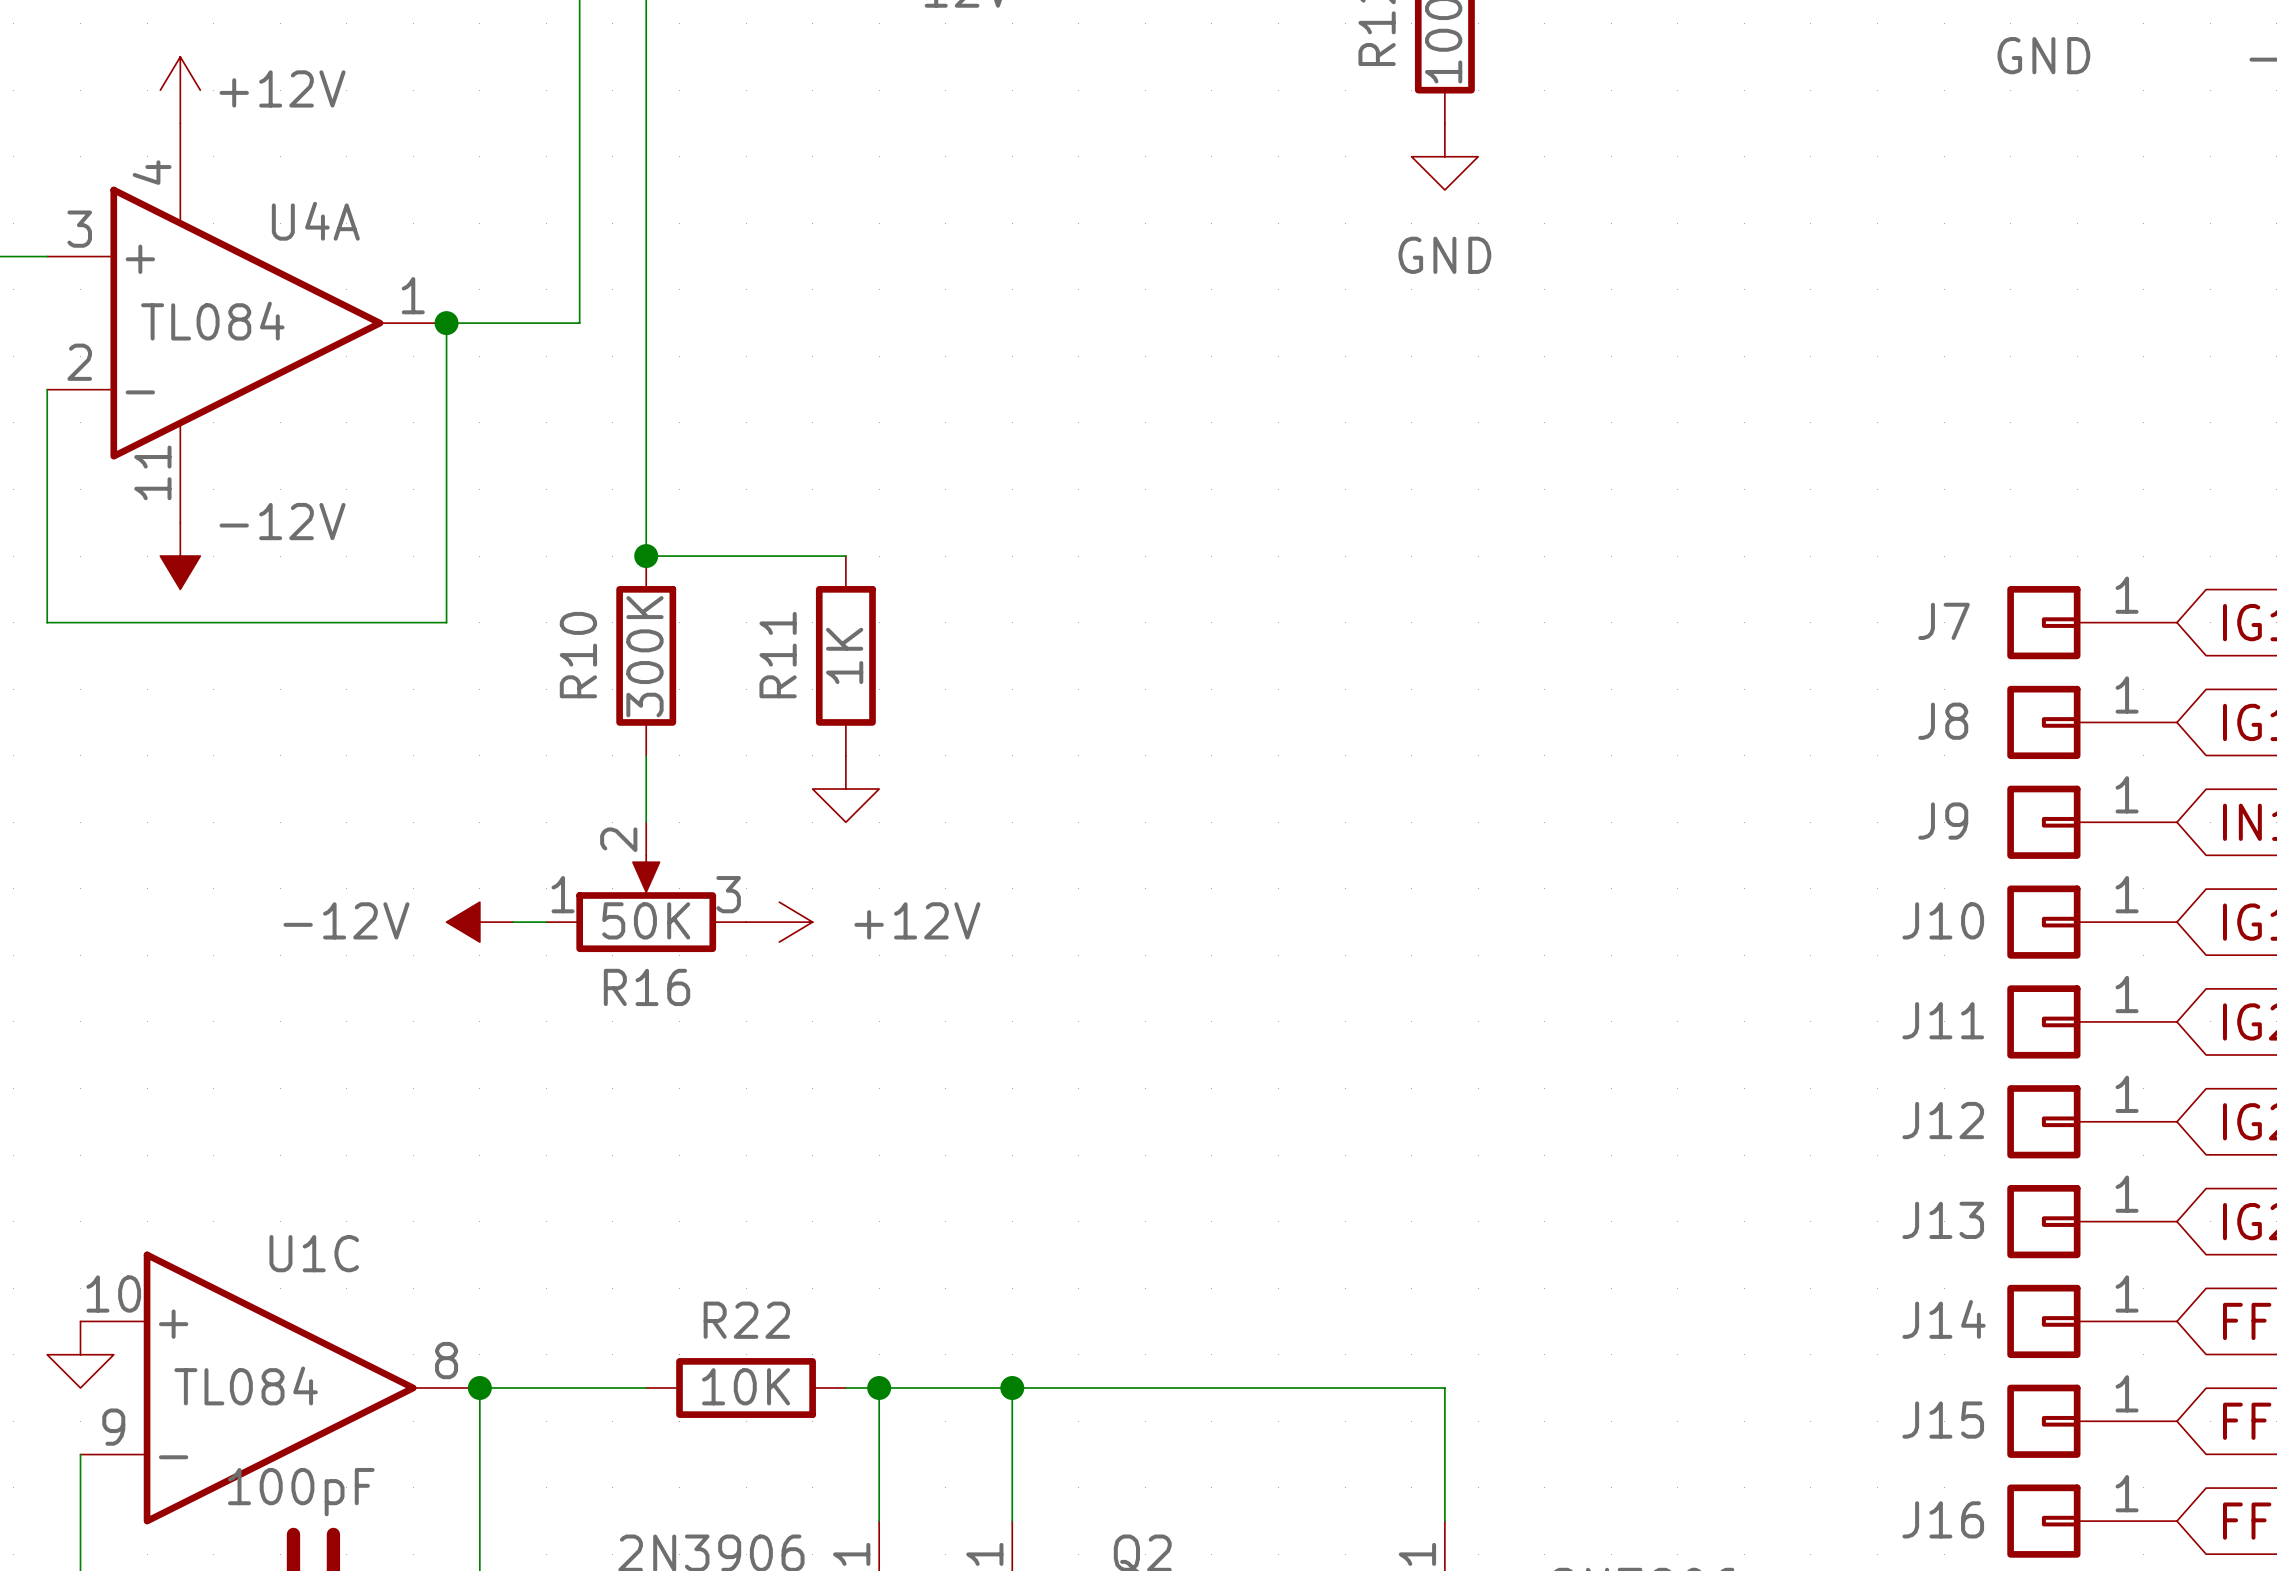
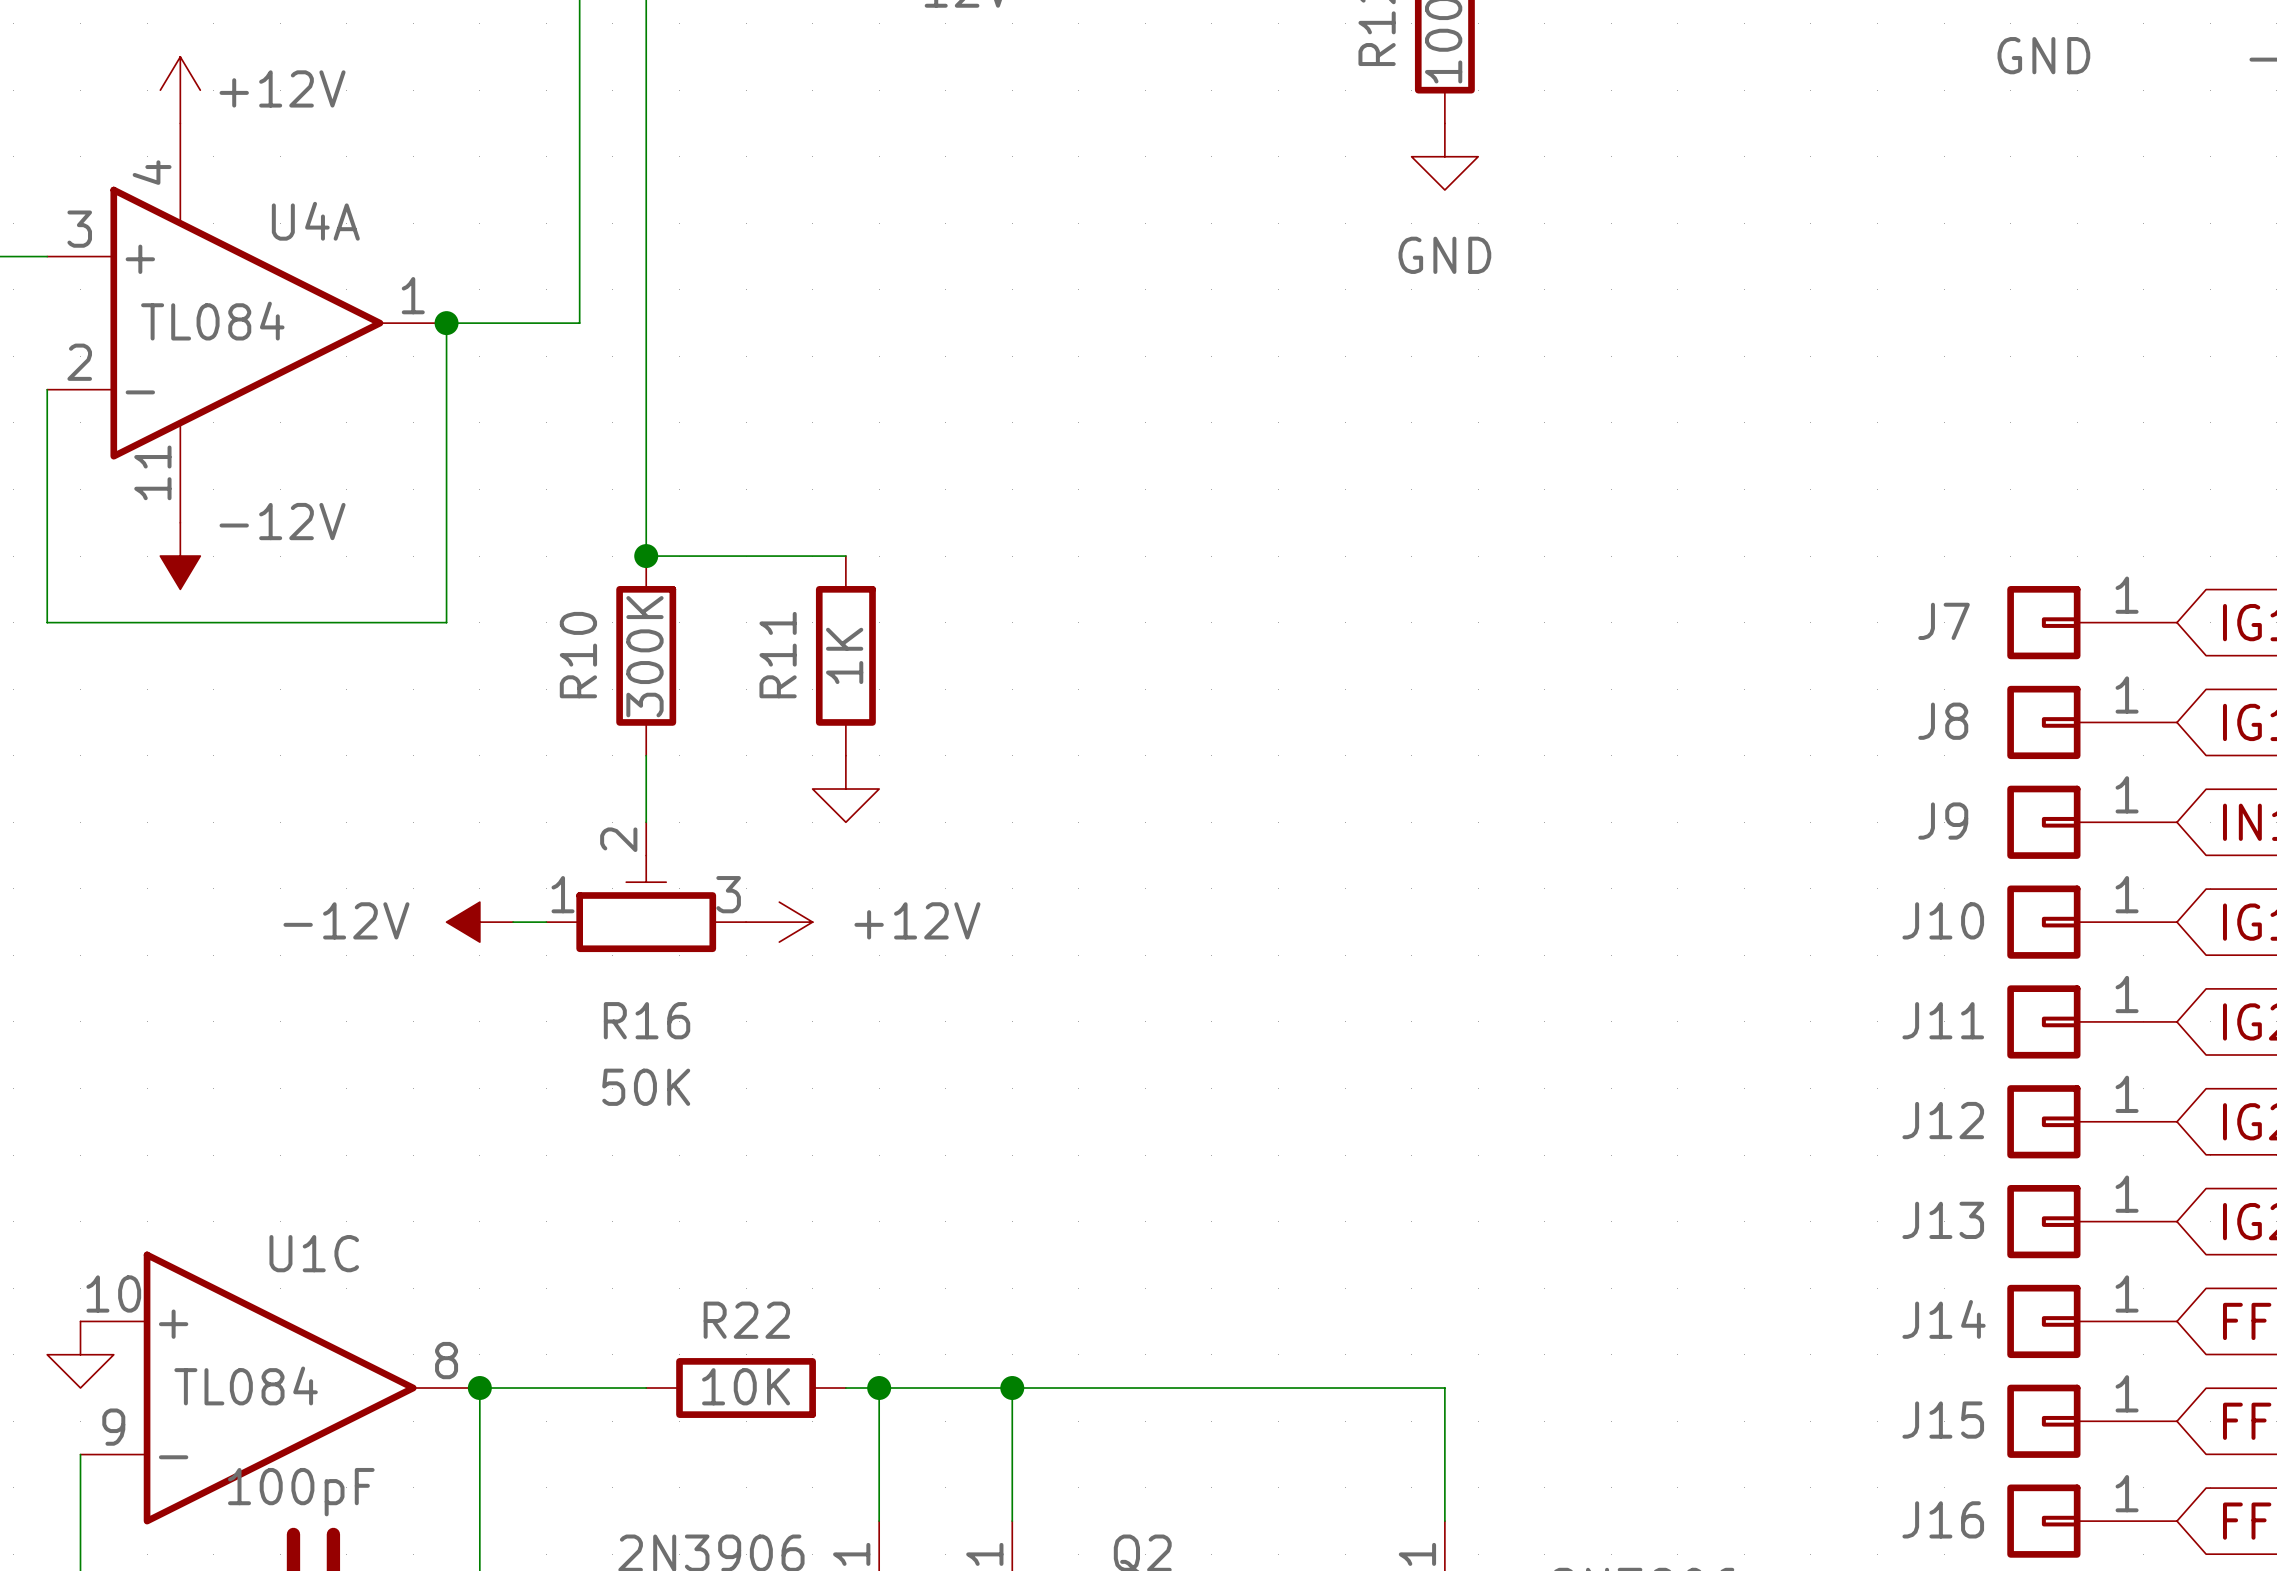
R16 symbol: [546, 822, 747, 953] -> [546, 822, 747, 953]
R16 value position: 50K (646, 920) -> 50K (646, 1087)
R16 name position: R16 (647, 987) -> R16 (647, 1020)

